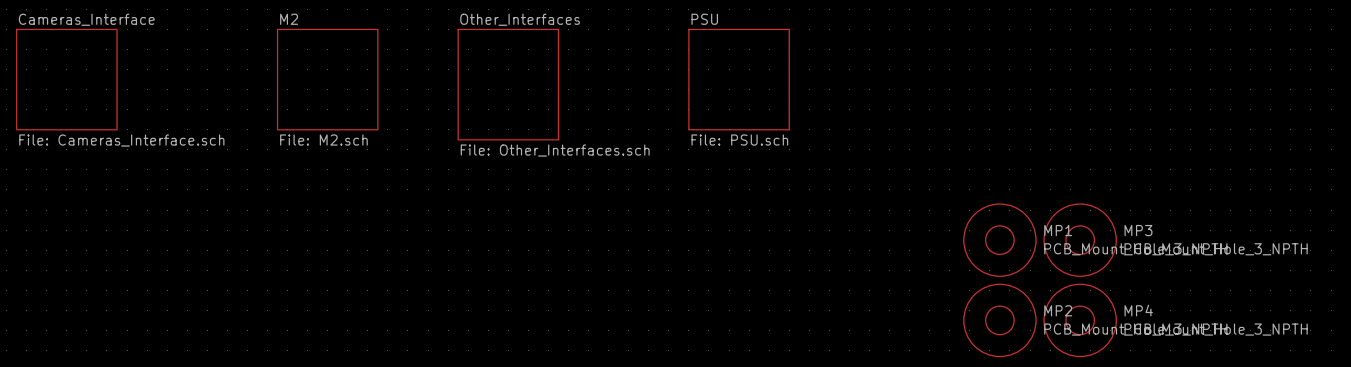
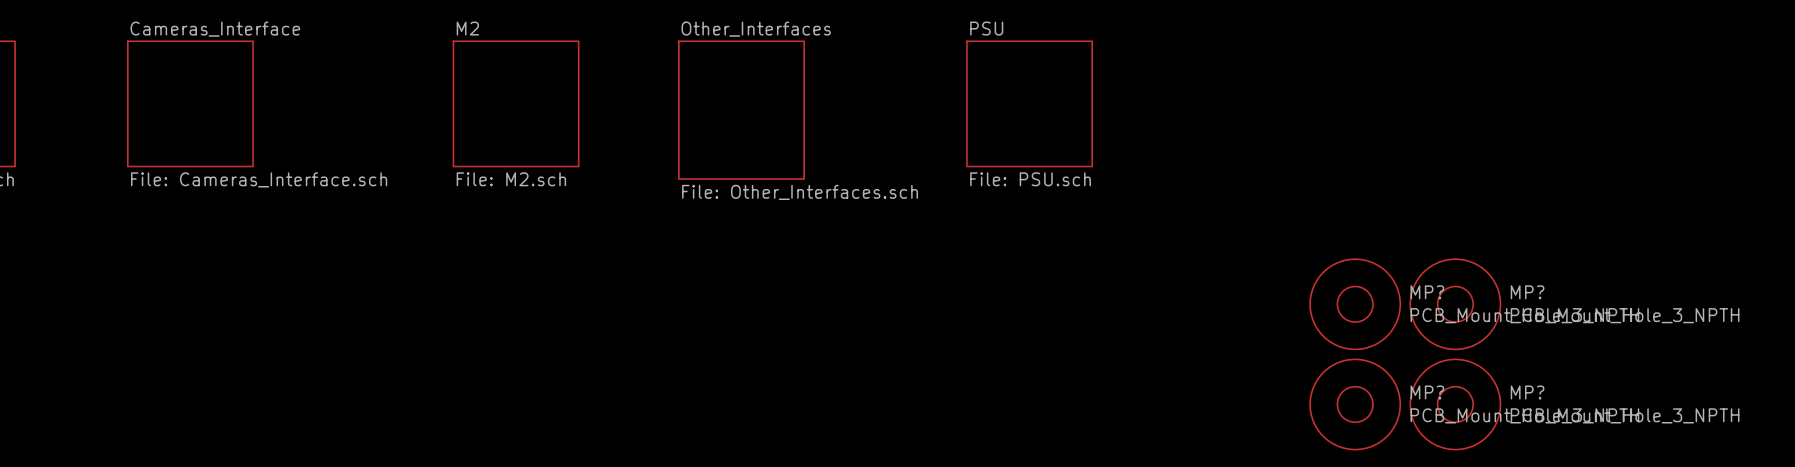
MP1 name: MP1 (1058, 230) -> MP? (1427, 292)
MP3 name: MP3 (1138, 230) -> MP? (1527, 292)
MP2 name: MP2 (1058, 310) -> MP? (1427, 392)
MP4 name: MP4 (1138, 310) -> MP? (1527, 392)

